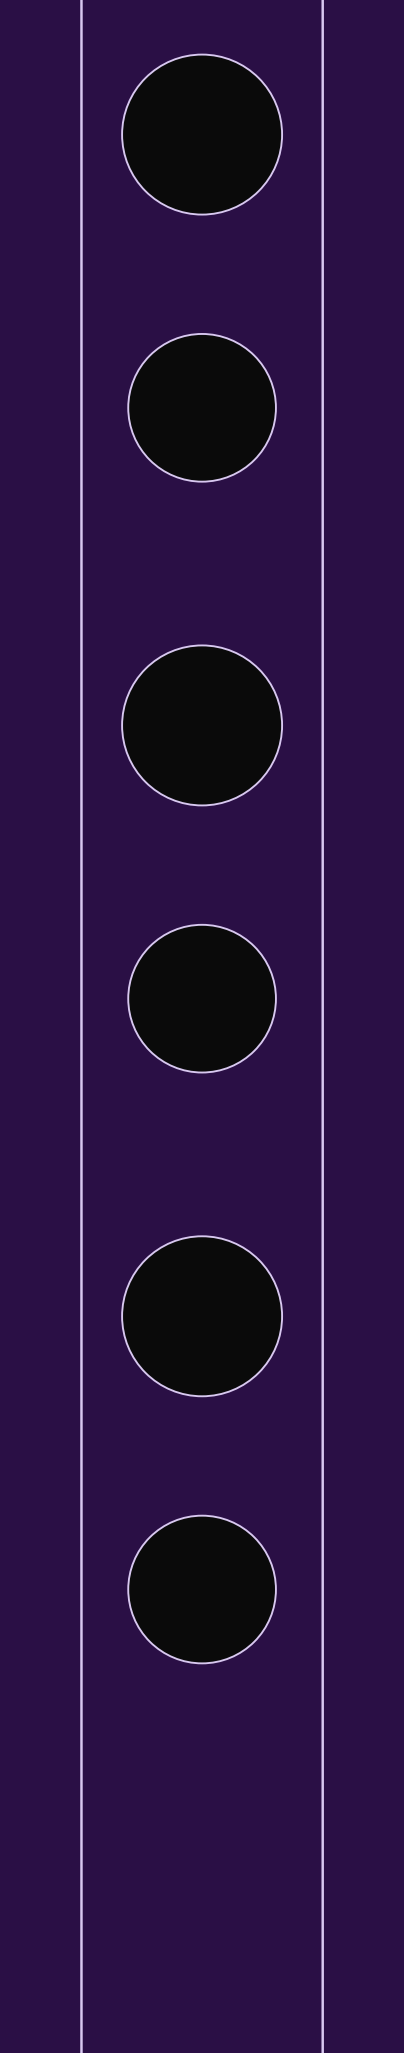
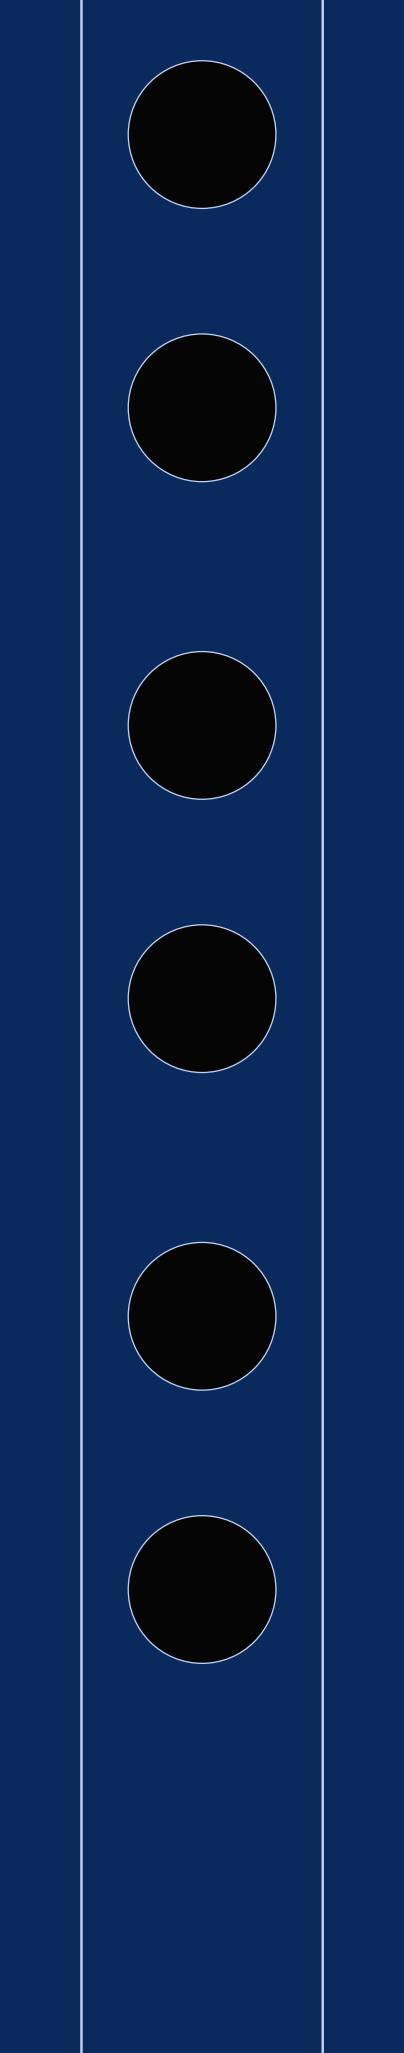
part footprint: [122, 54, 283, 215] -> [128, 60, 276, 209]
part footprint: [122, 645, 283, 806] -> [128, 651, 276, 800]
part footprint: [122, 1236, 283, 1397] -> [128, 1242, 276, 1391]

